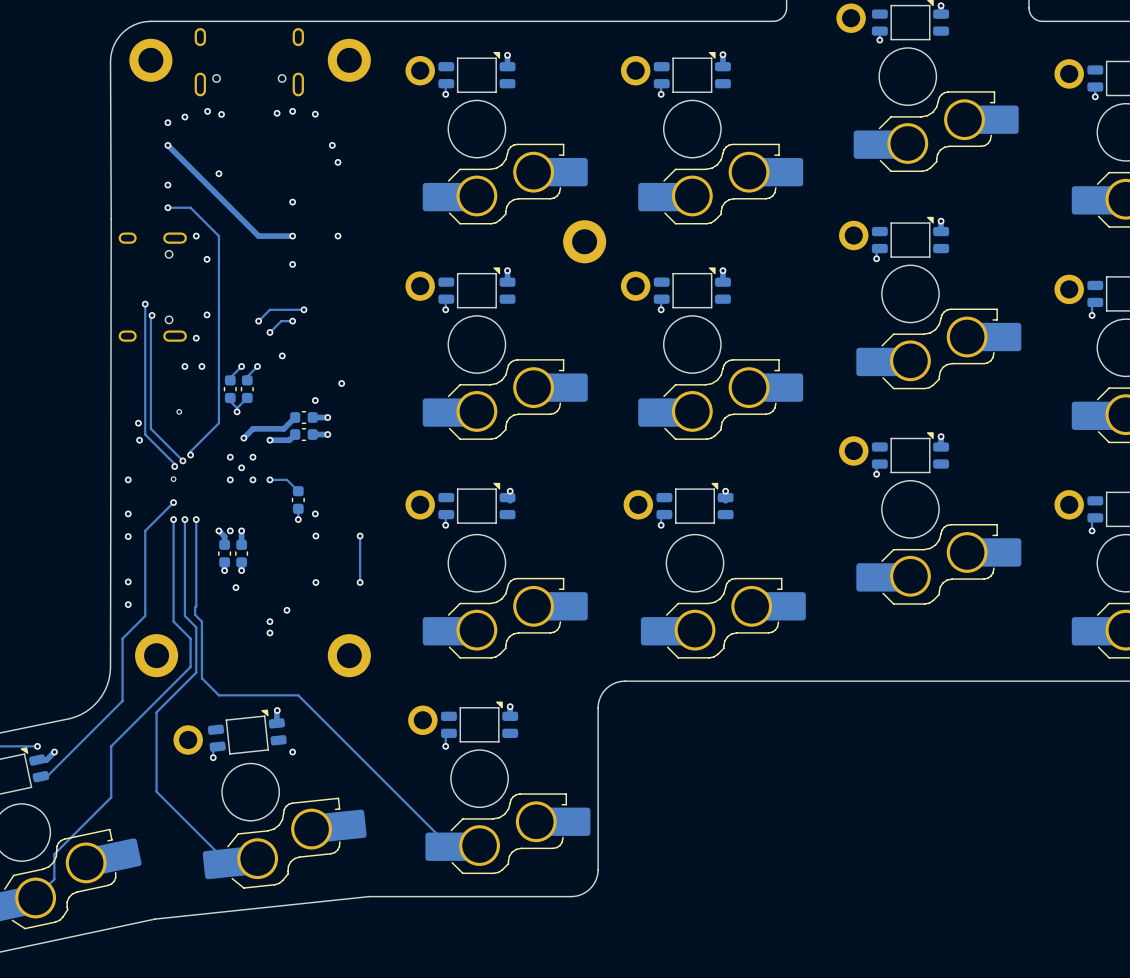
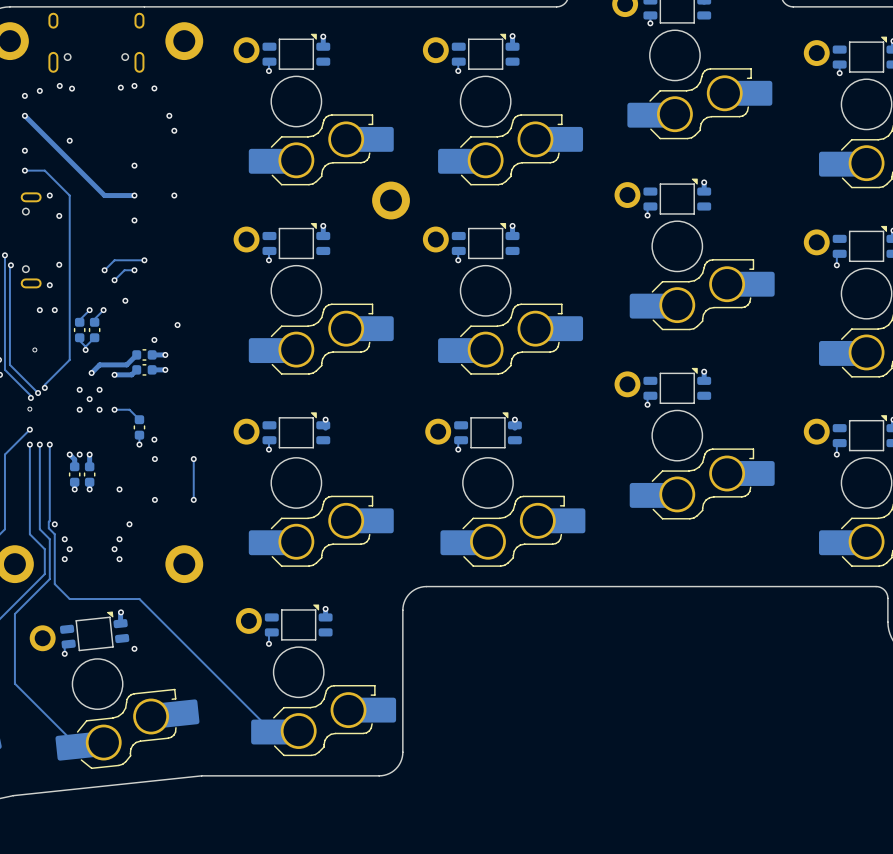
via: none -> (119, 489)
via: (235, 587) -> none
via: none -> (54, 524)
via: (269, 621) -> none
via: none -> (64, 539)
via: none -> (119, 539)
via: (269, 632) -> none
via: none -> (69, 549)
via: none -> (114, 549)
via: none -> (64, 559)
via: none -> (119, 559)

